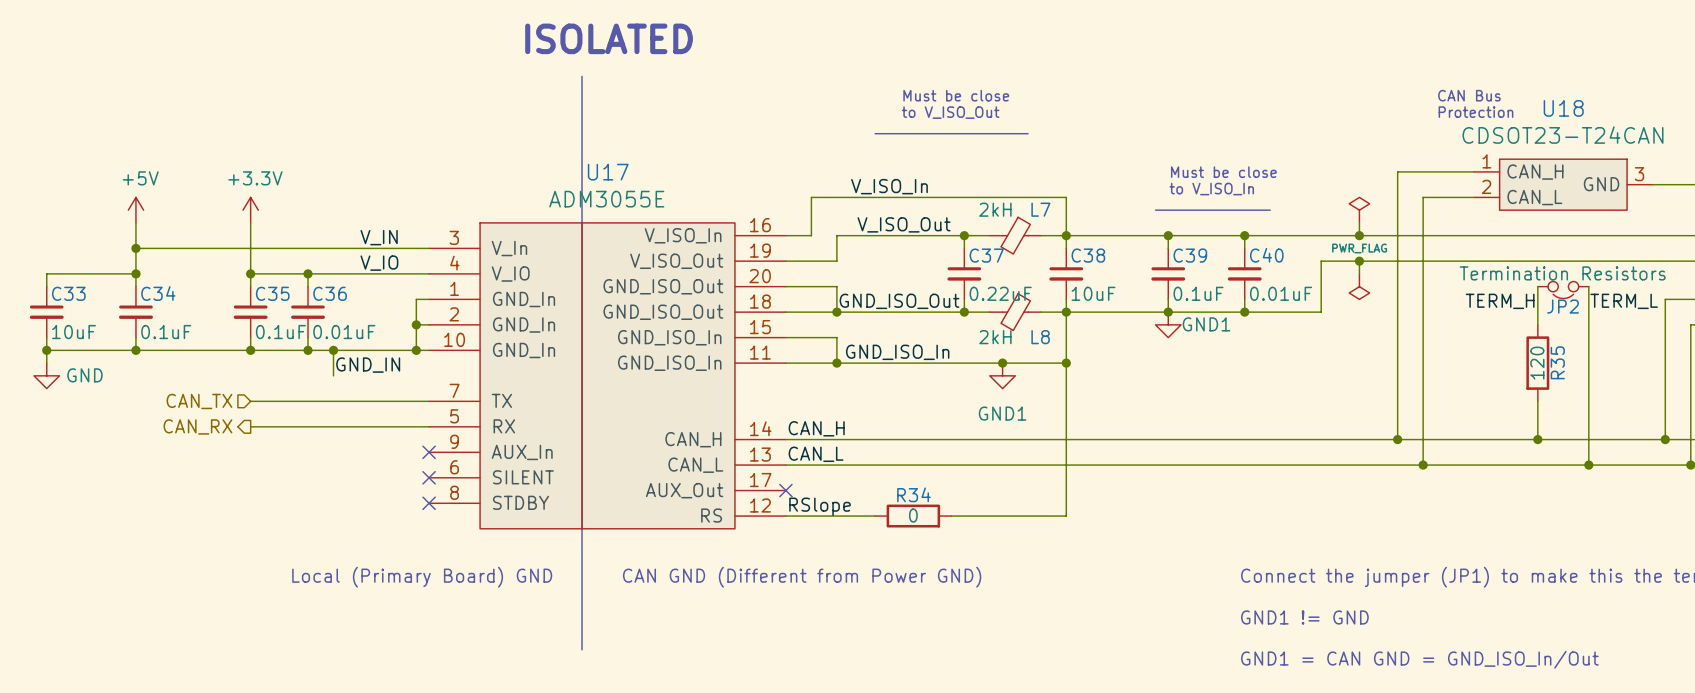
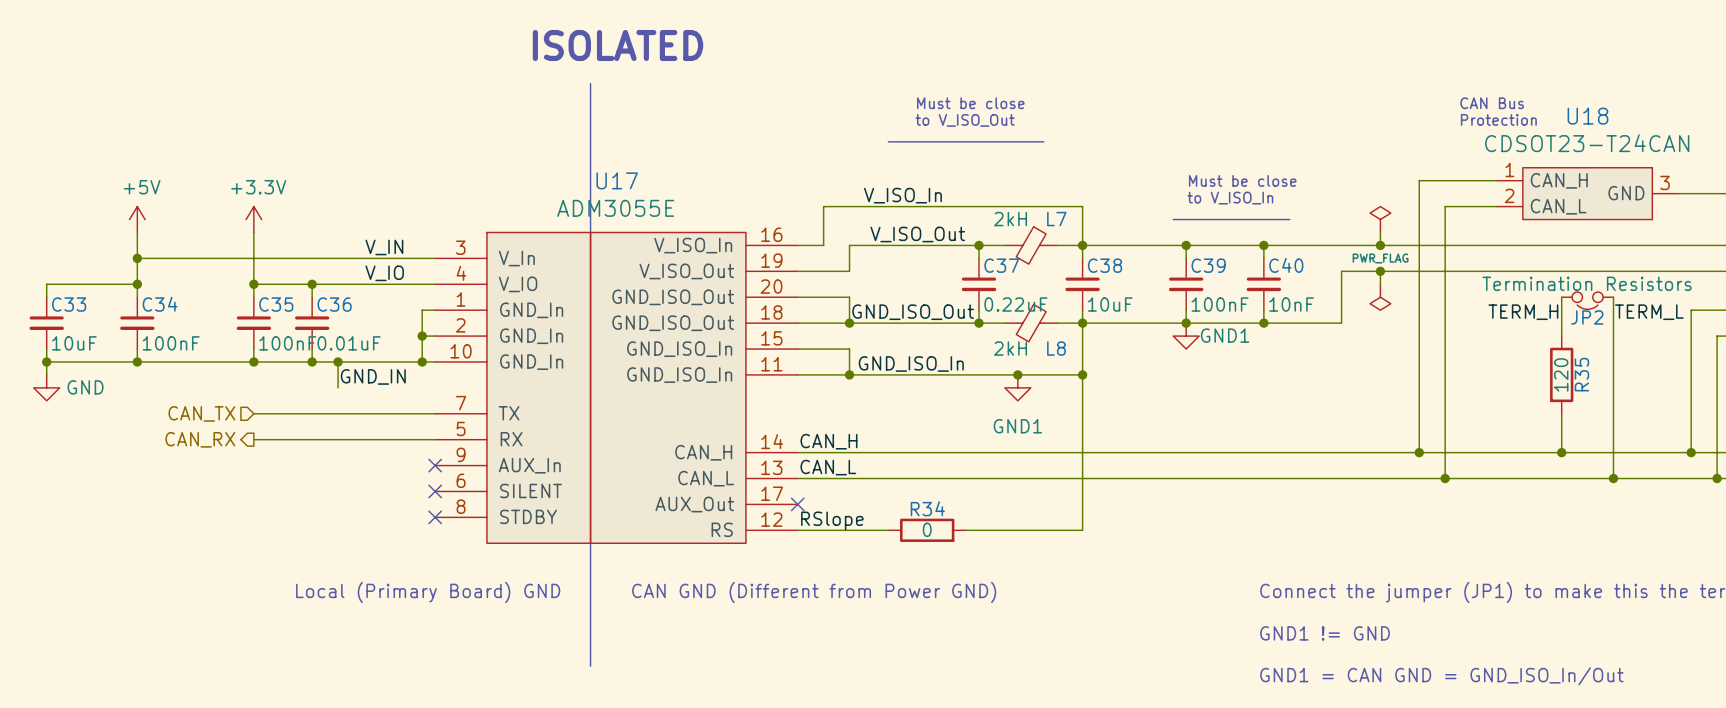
C39 value: 0.1uF (1198, 293) -> 100nF (1220, 304)
C40 value: 0.01uF (1281, 293) -> 10nF (1291, 304)
C34 value: 0.1uF (166, 332) -> 100nF (171, 343)
C35 value: 0.1uF (280, 332) -> 100nF (287, 343)

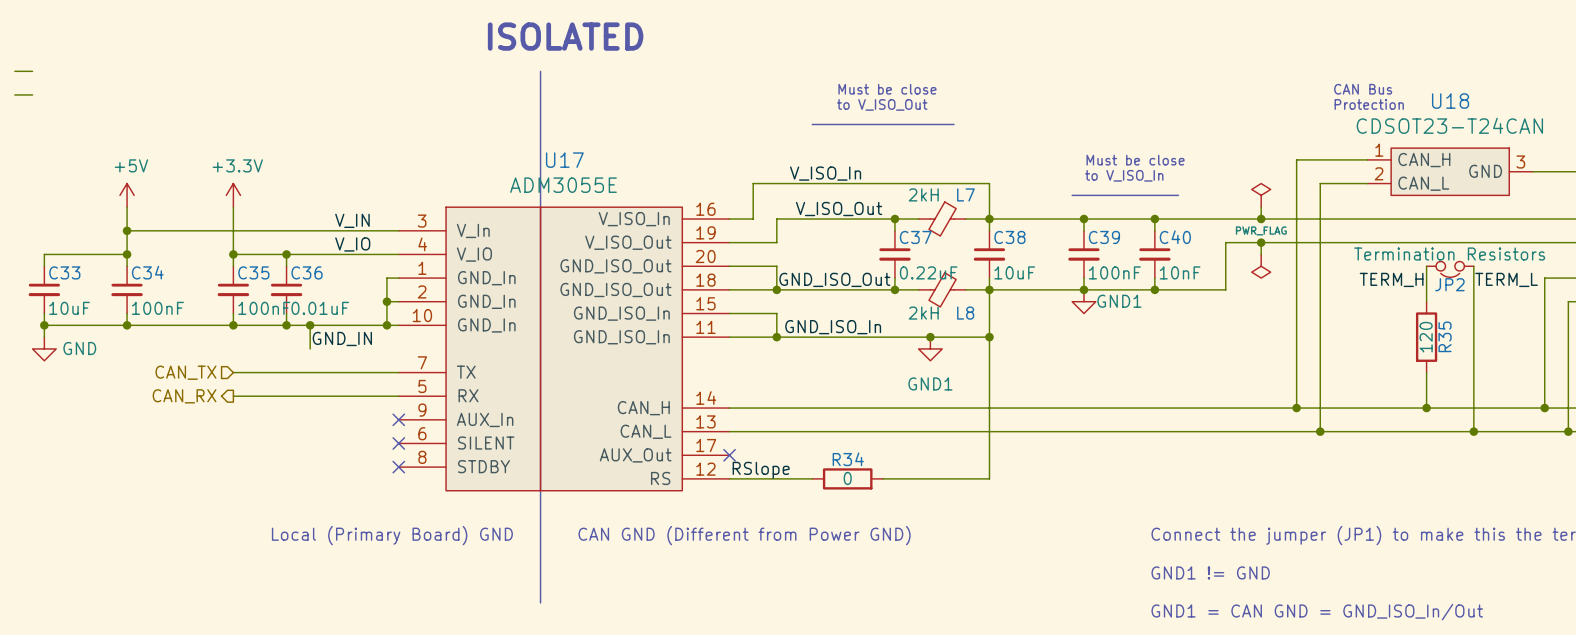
wire: none -> (14, 71) (32, 71)
wire: none -> (14, 94) (32, 94)
label: CAN_H (828, 441) -> none
label: CAN_L (828, 467) -> none

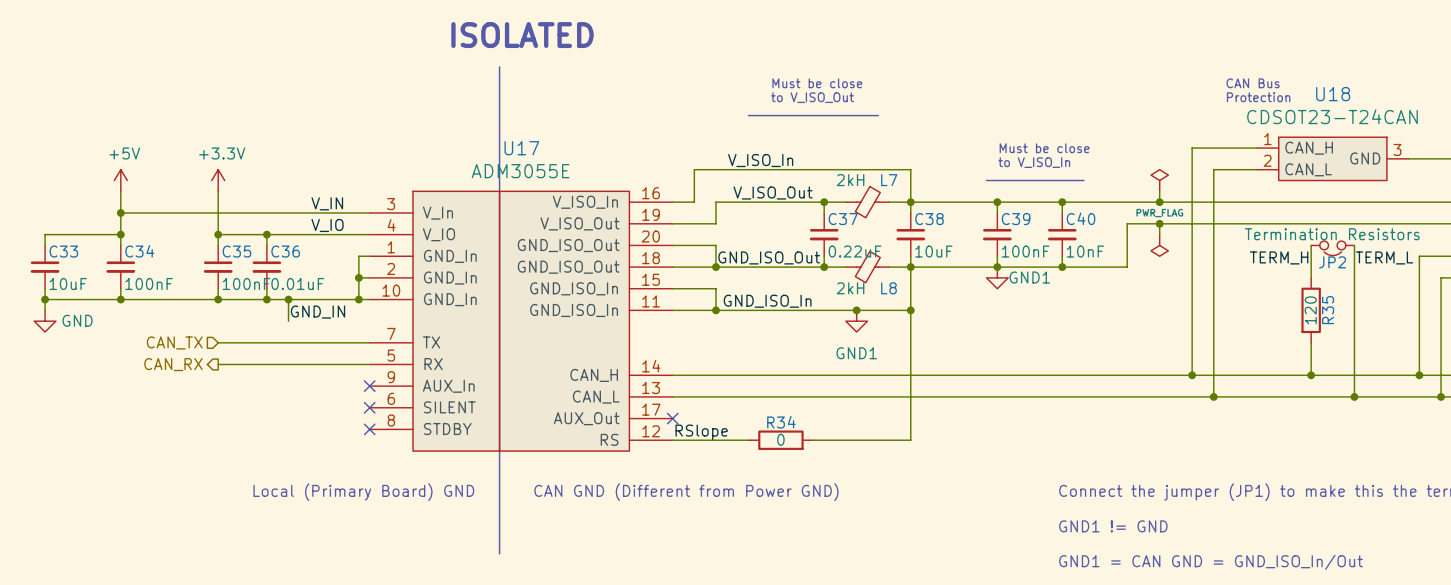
wire: (14, 71) (32, 71) -> none
wire: (14, 94) (32, 94) -> none

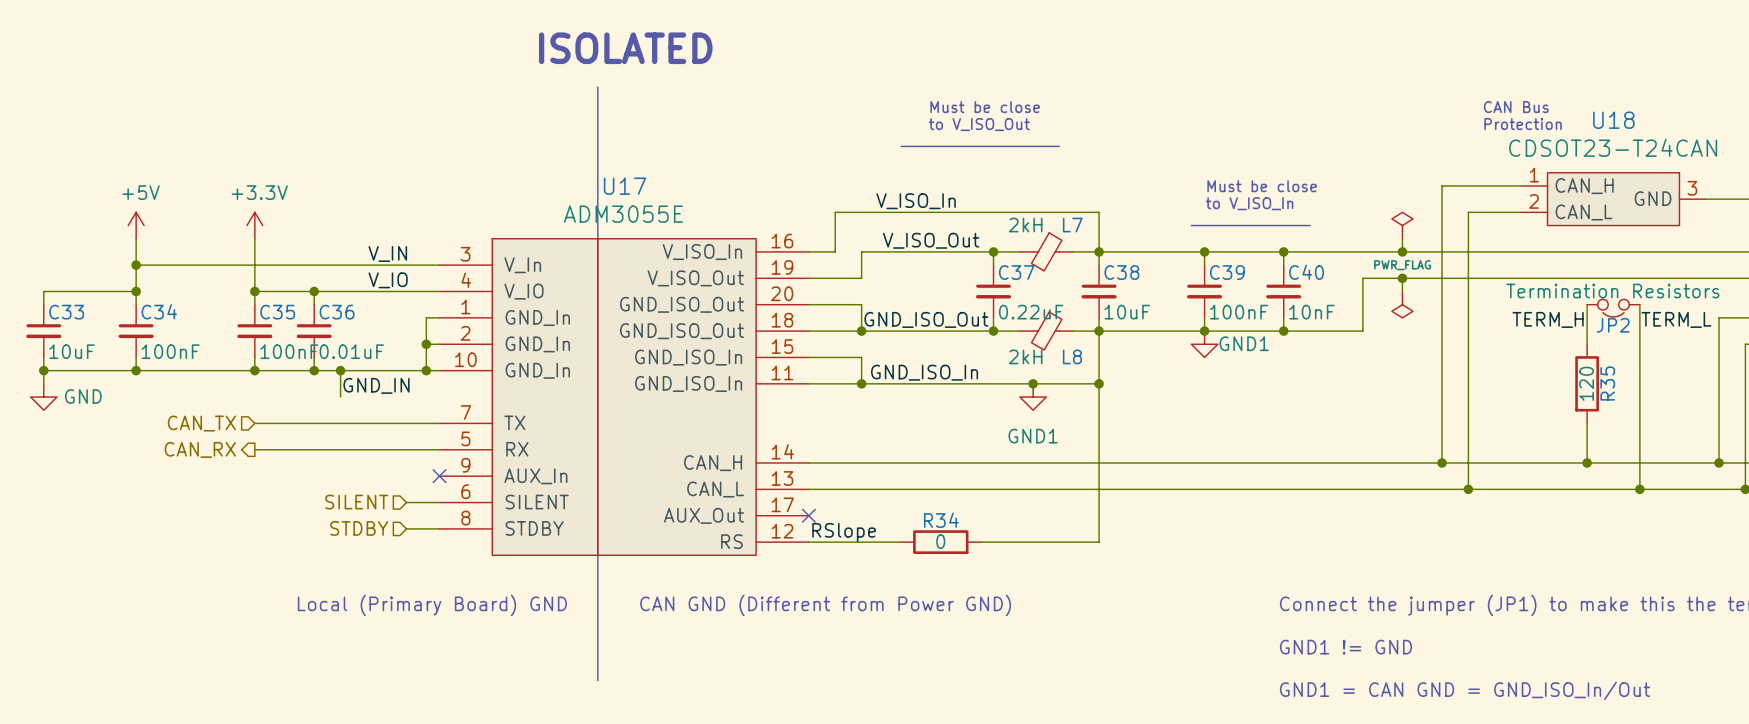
hierarchical label: none -> SILENT (356, 502)
wire: none -> (406, 502) (439, 502)
no-connect mark: (369, 407) -> none
hierarchical label: none -> STDBY (359, 528)
wire: none -> (406, 528) (439, 528)
no-connect mark: (369, 429) -> none

